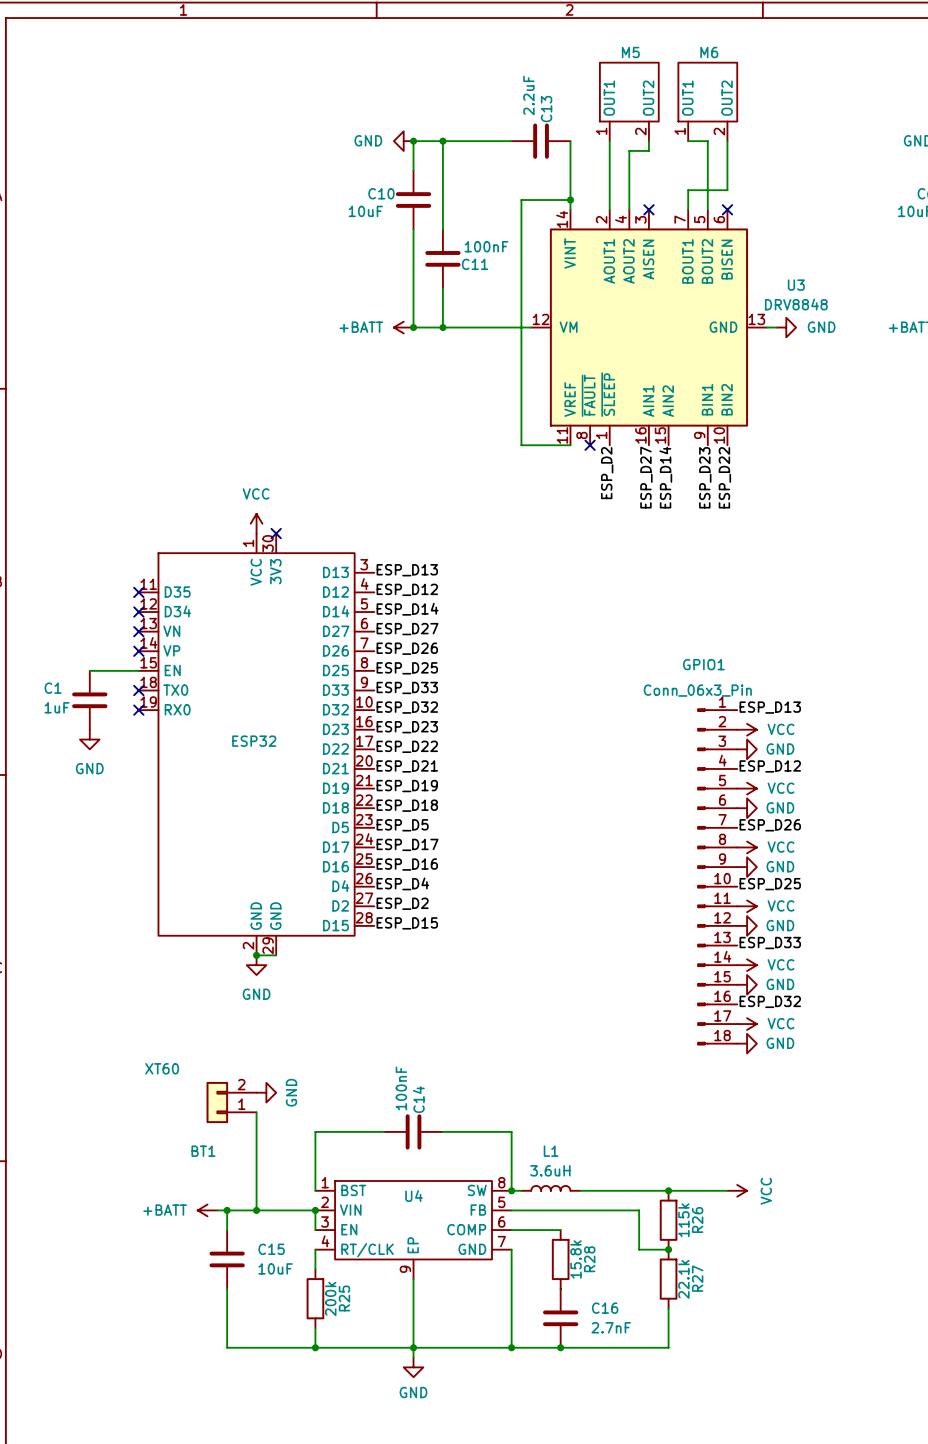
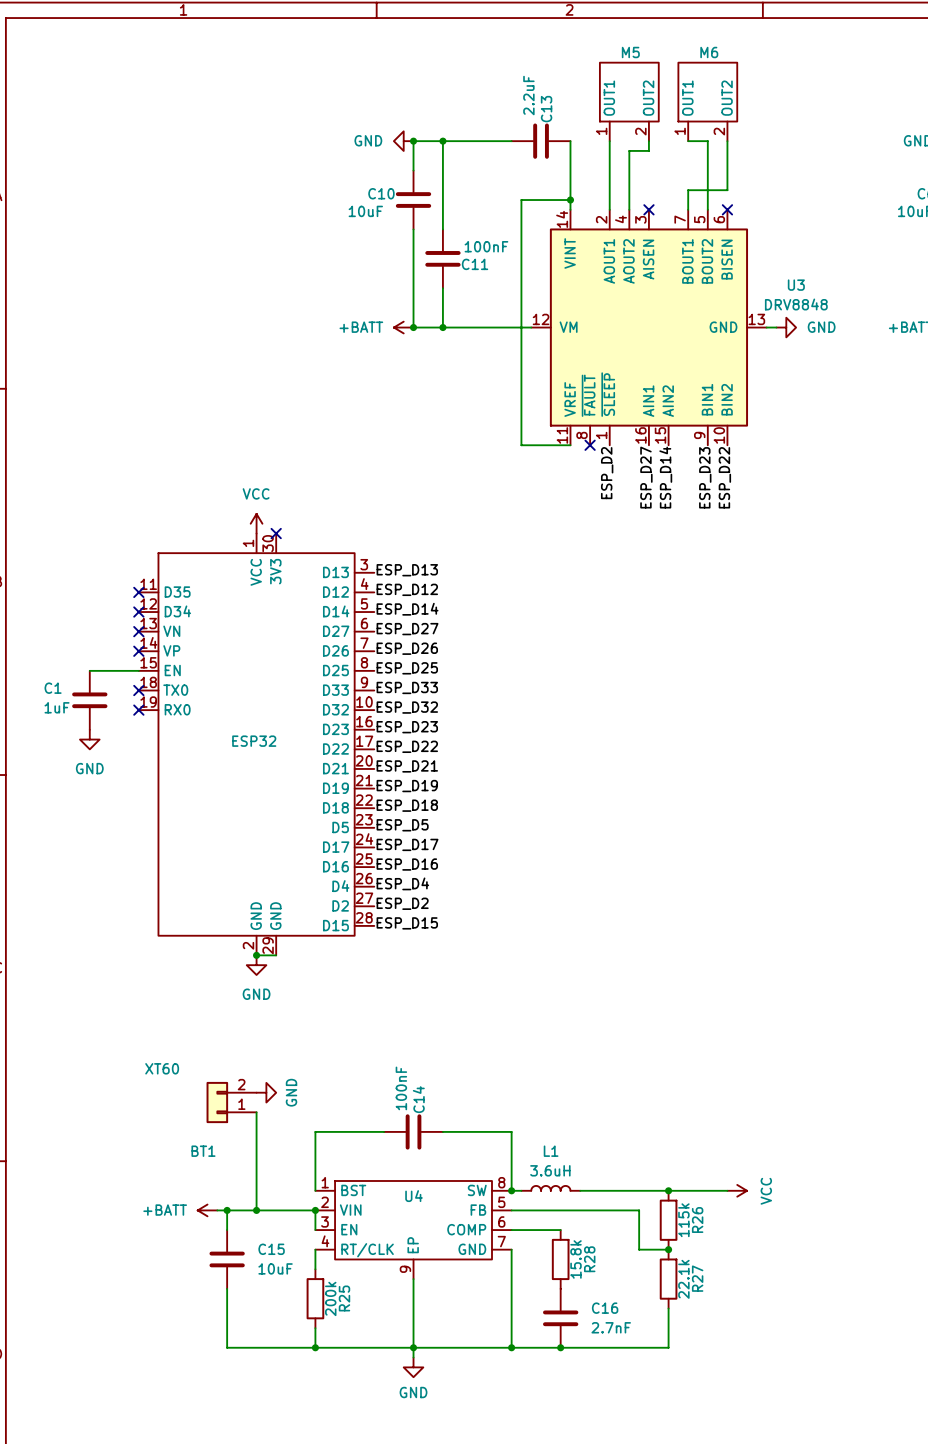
label: ESP_D13 (770, 707) -> none
power symbol: VCC (747, 729) -> none
power symbol: GND (747, 749) -> none
label: ESP_D12 (770, 766) -> none
power symbol: VCC (747, 788) -> none
power symbol: GND (747, 808) -> none
label: ESP_D26 (770, 825) -> none
power symbol: VCC (747, 847) -> none
power symbol: GND (747, 867) -> none
GPIO1: Conn_06x3_Pin (717, 876) -> none
label: ESP_D25 (770, 884) -> none
power symbol: VCC (747, 906) -> none
power symbol: GND (747, 925) -> none
label: ESP_D33 (770, 943) -> none
power symbol: VCC (747, 965) -> none
power symbol: GND (747, 984) -> none
label: ESP_D32 (770, 1001) -> none
power symbol: VCC (747, 1024) -> none
power symbol: GND (747, 1043) -> none

